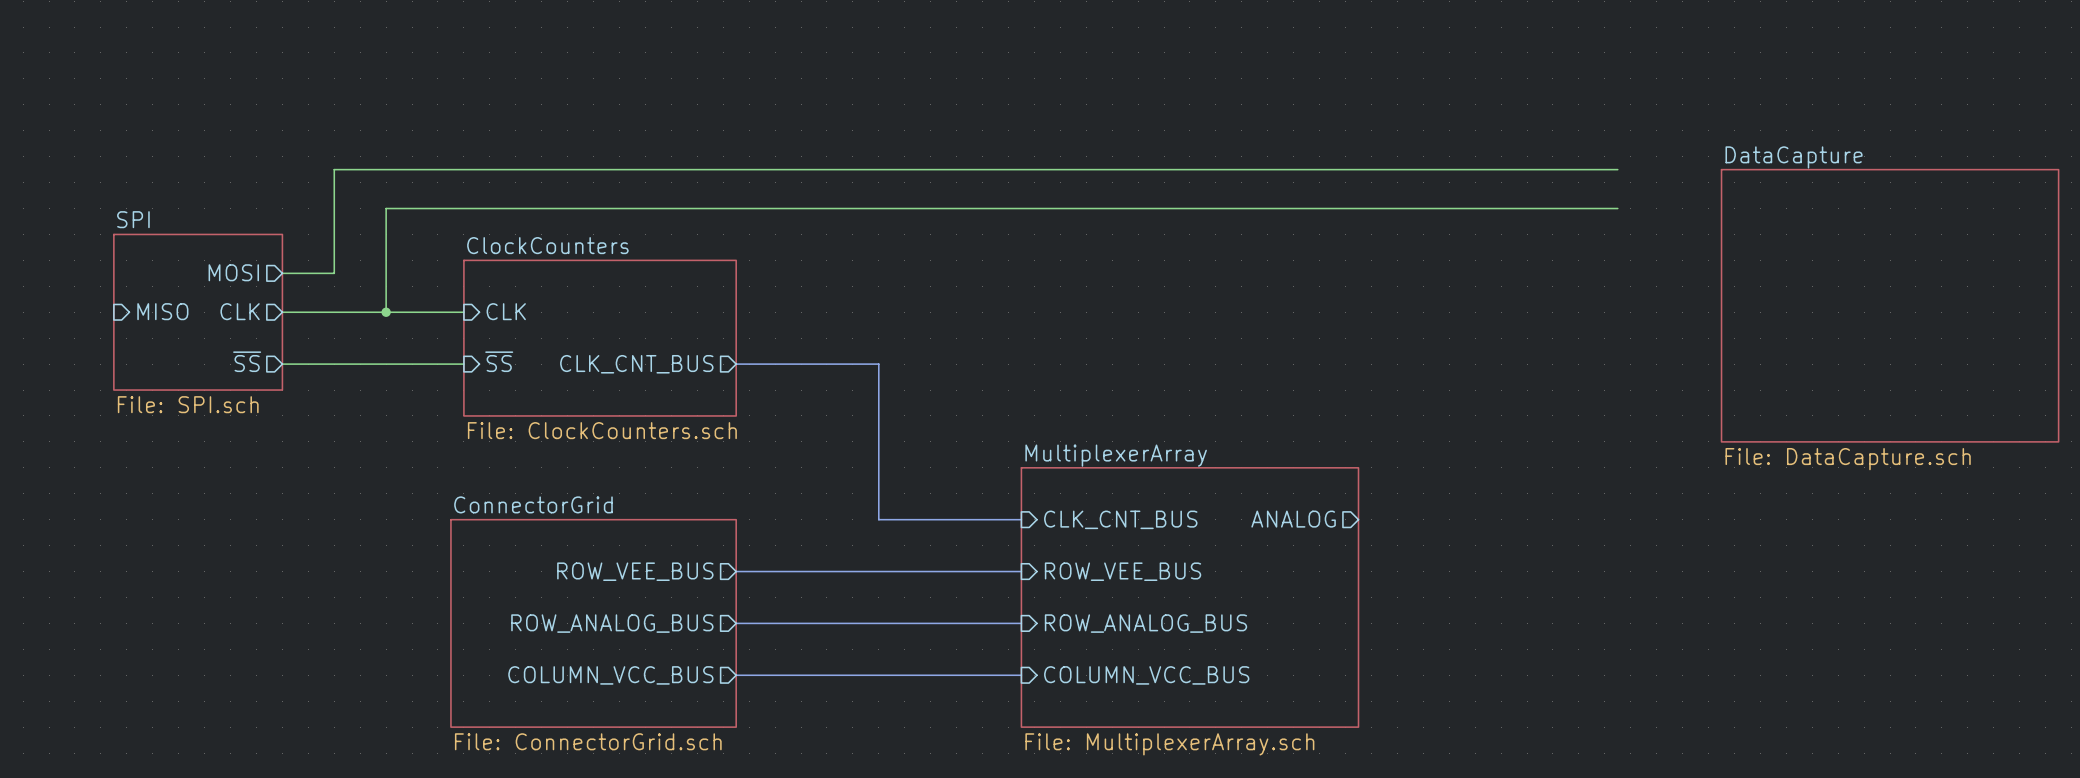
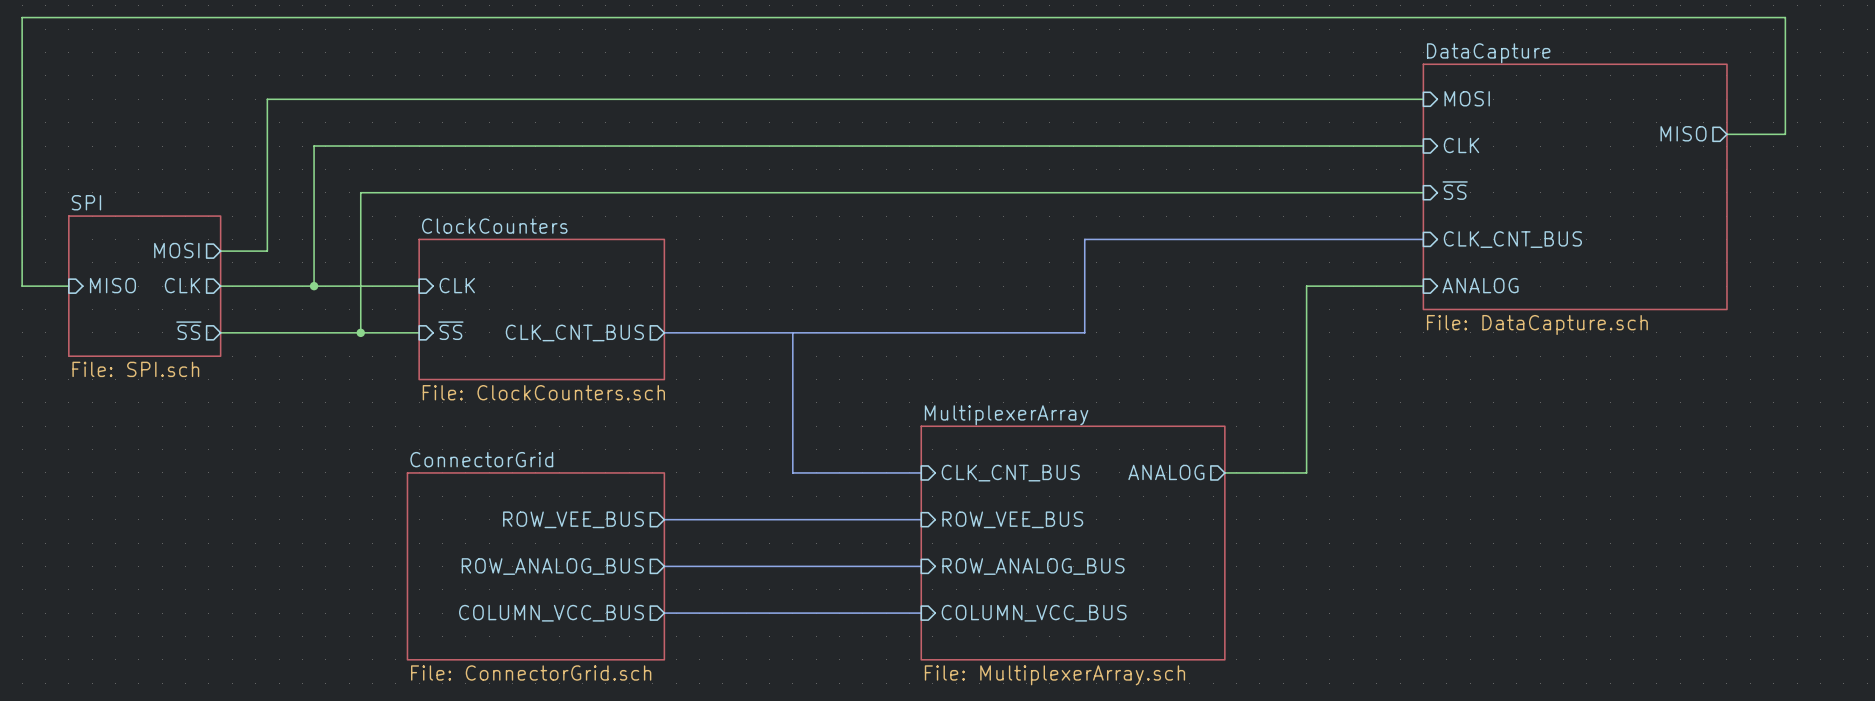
sheet pin: none -> MOSI (1467, 98)
sheet pin: none -> MISO (1683, 133)
wire: none -> (1726, 134) (1785, 134) (1785, 17) (22, 17) (22, 286) (68, 286)
wire: none -> (1423, 146) (314, 146) (314, 286)
sheet pin: none -> CLK (1461, 145)
wire: (1617, 169) (334, 169) (334, 273) (295, 273) -> (1423, 99) (267, 99) (267, 251)
sheet pin: none -> ~{SS} (1455, 190)
wire: (399, 208) (386, 208) (386, 312) -> (360, 192) (360, 332)
wire: (1578, 208) (1617, 208) -> none
bus: none -> (1423, 239) (1084, 239) (1084, 332) (792, 332)
sheet pin: none -> CLK_CNT_BUS (1512, 239)
sheet pin position: MOSI (233, 272) -> MOSI (176, 250)
wire: none -> (220, 251) (255, 251)
sheet DataCapture position: (1890, 305) -> (1575, 186)
sheet pin position: MISO (162, 311) -> MISO (112, 285)
sheet pin position: CLK (240, 311) -> CLK (182, 285)
sheet pin: none -> ANALOG (1480, 285)
sheet SPI position: (198, 312) -> (144, 286)
wire: none -> (220, 286) (255, 286)
junction: none -> (314, 286)
junction: (386, 312) -> none
wire: none -> (1423, 286) (1306, 286) (1306, 472) (1224, 472)
sheet pin position: ~{SS} (247, 361) -> ~{SS} (188, 330)
wire: none -> (220, 332) (255, 332)
junction: none -> (360, 332)

